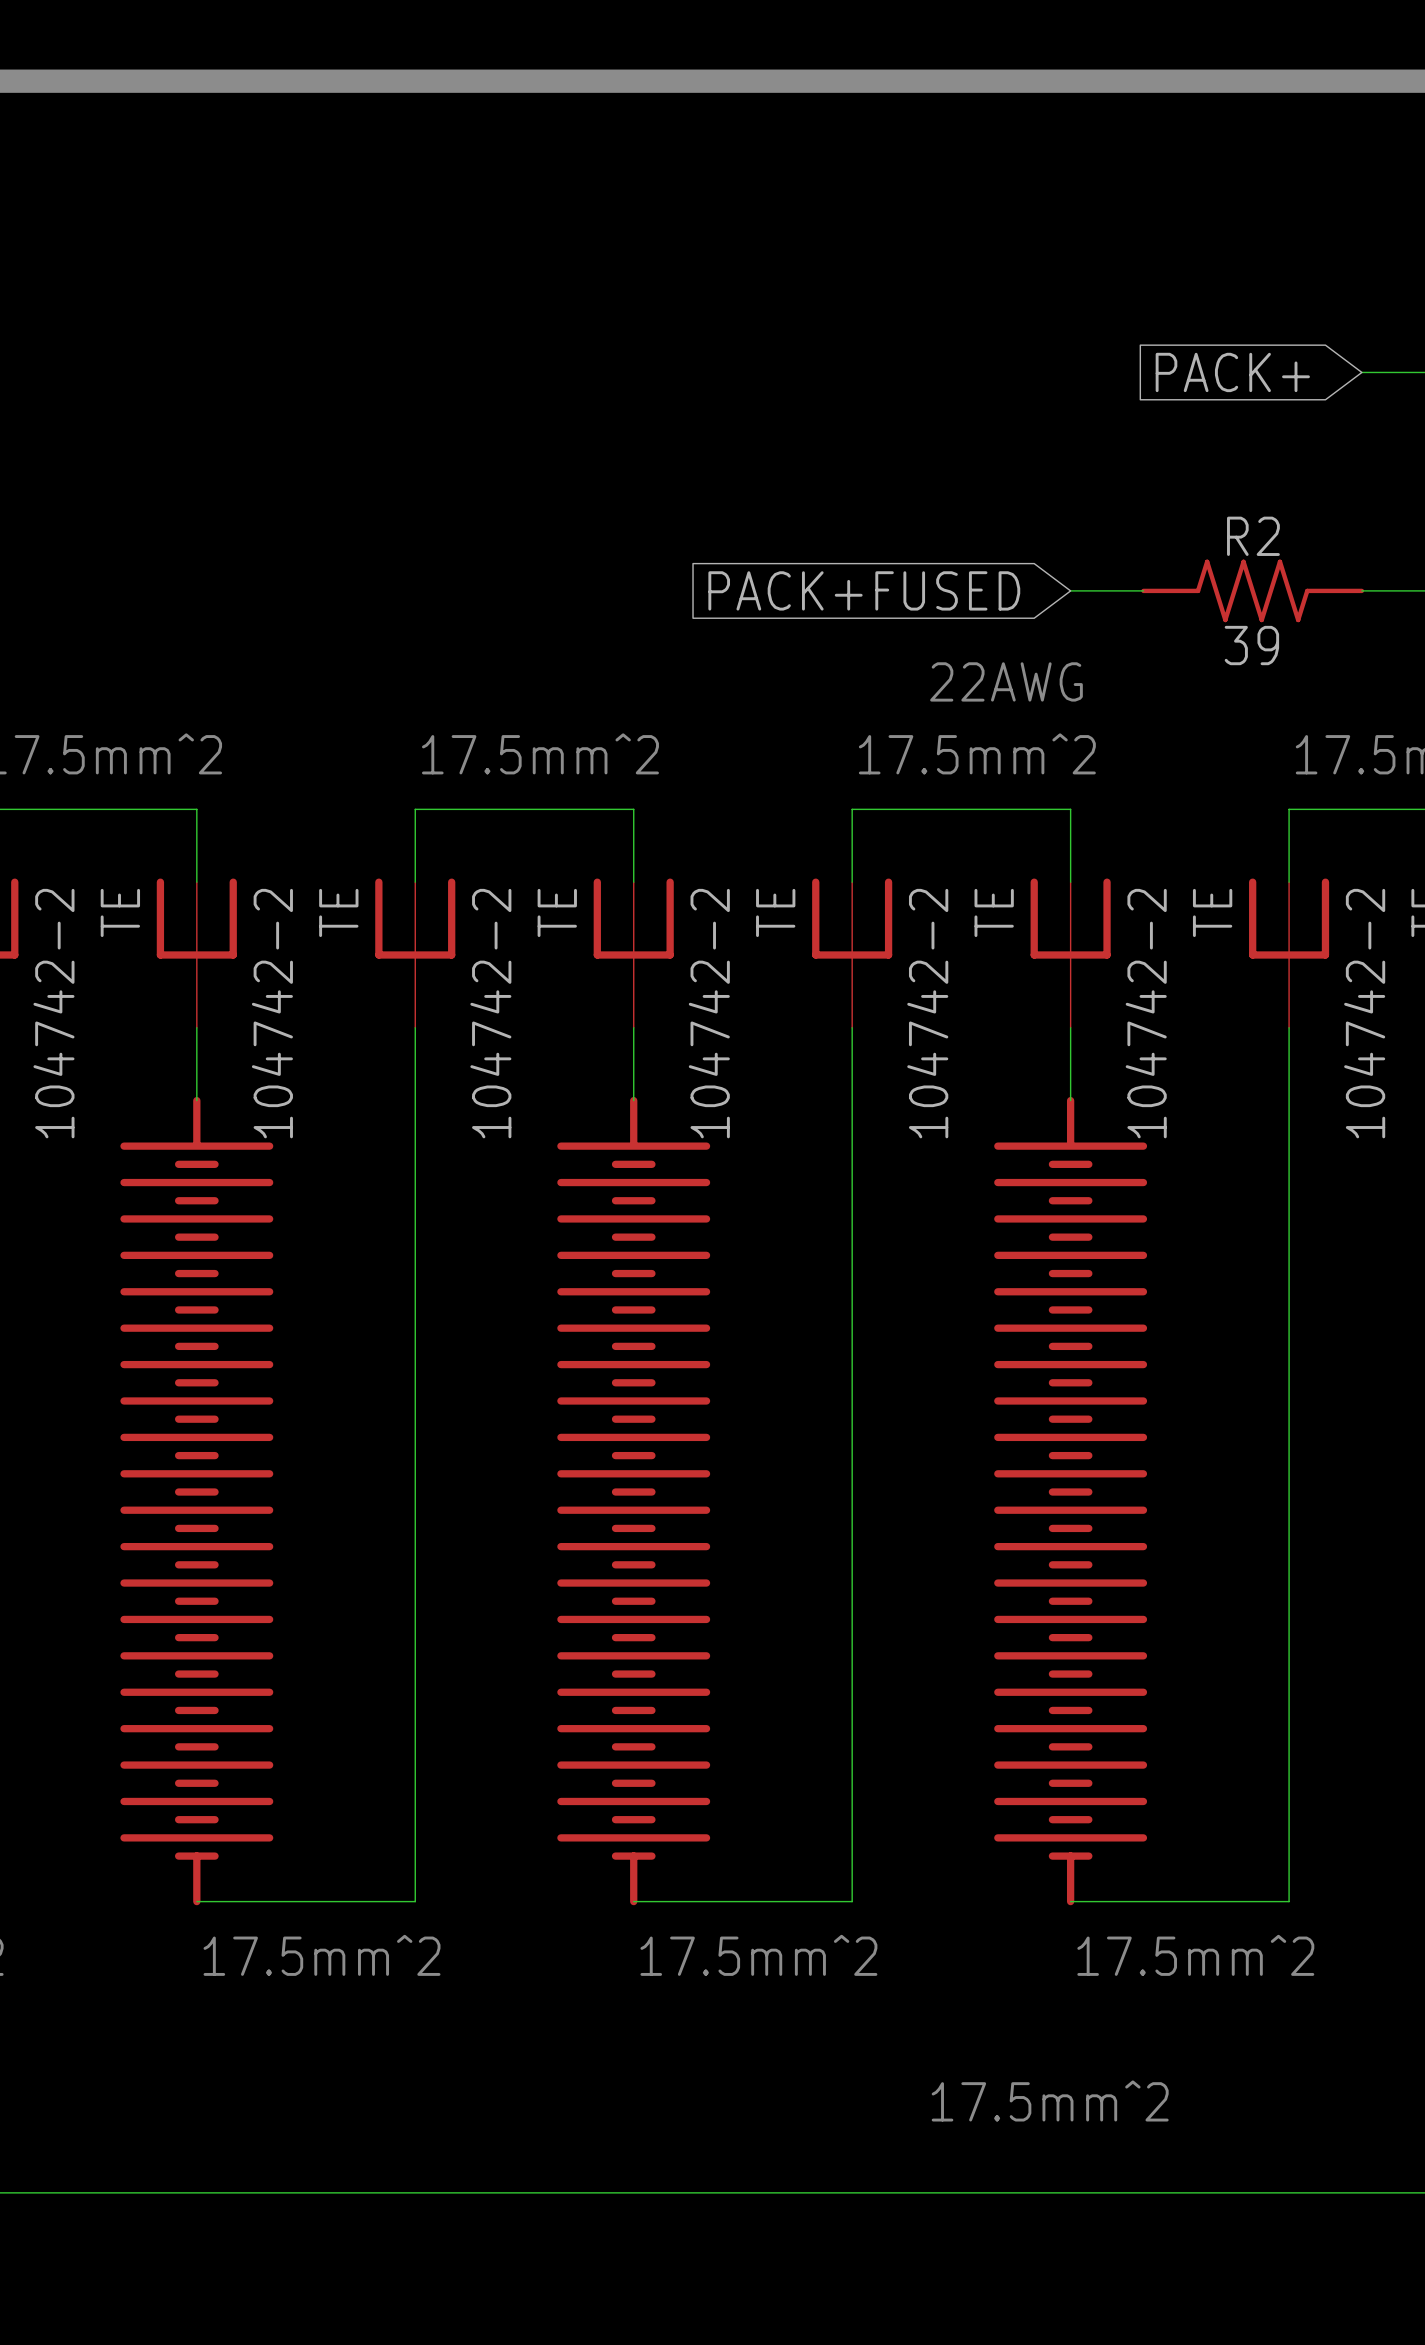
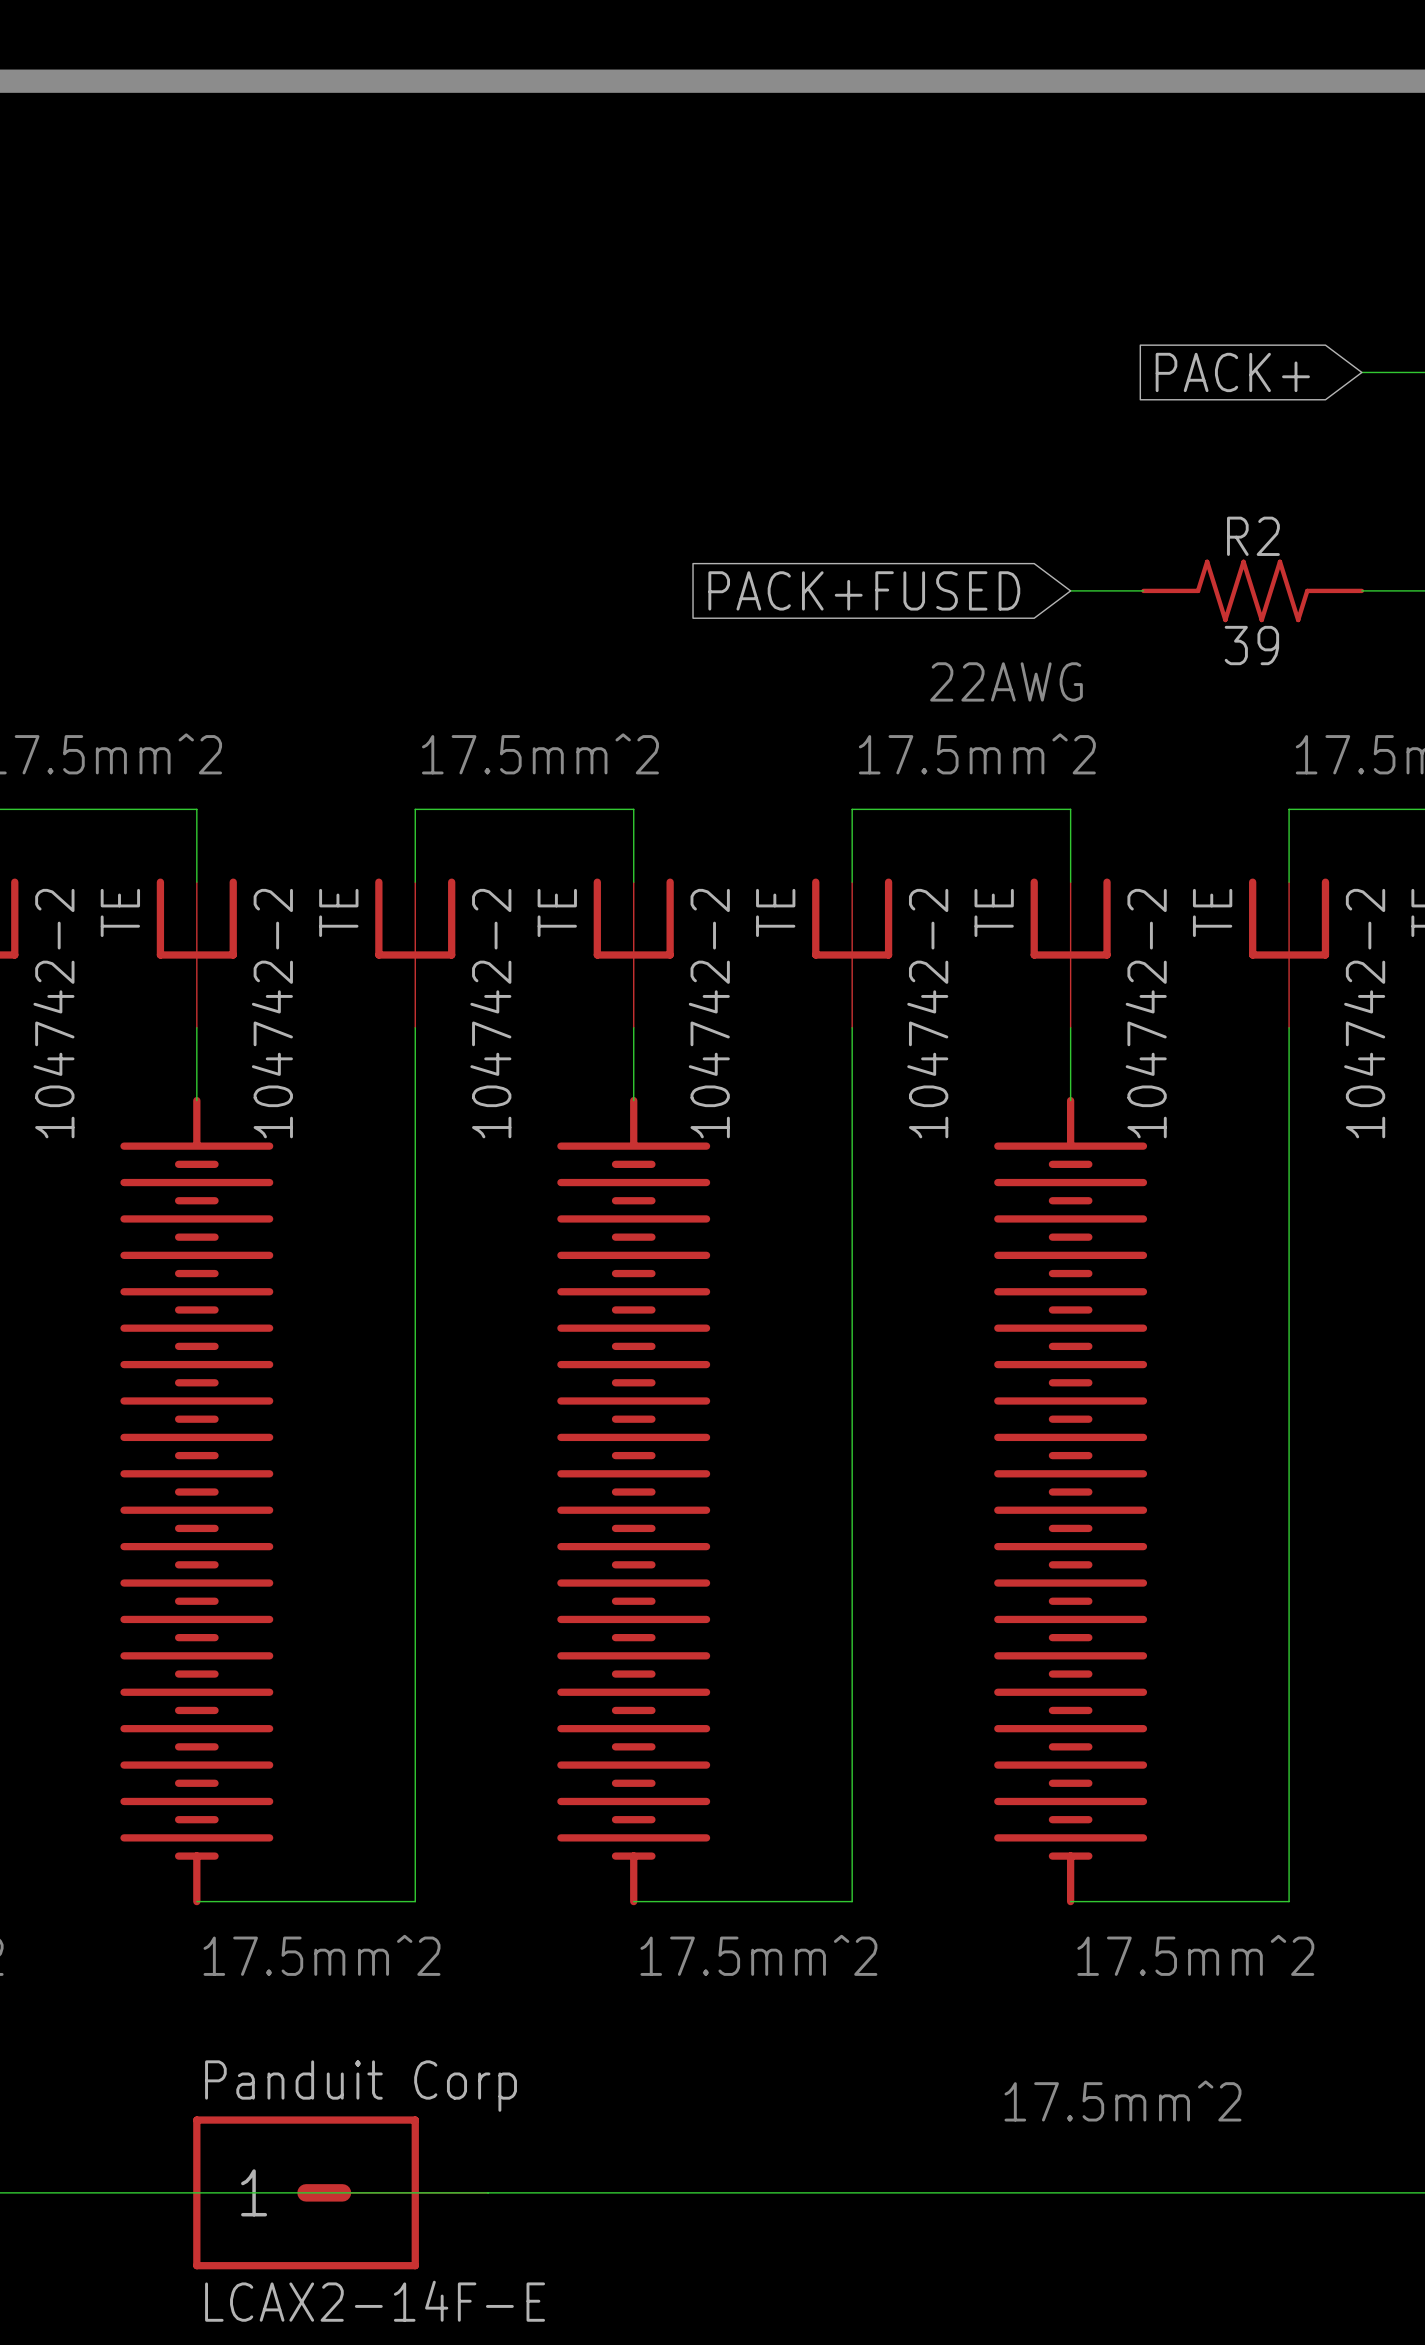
text position: 17.5mm^2 (1050, 2100) -> 17.5mm^2 (1122, 2100)
part: none -> (340, 2192)

